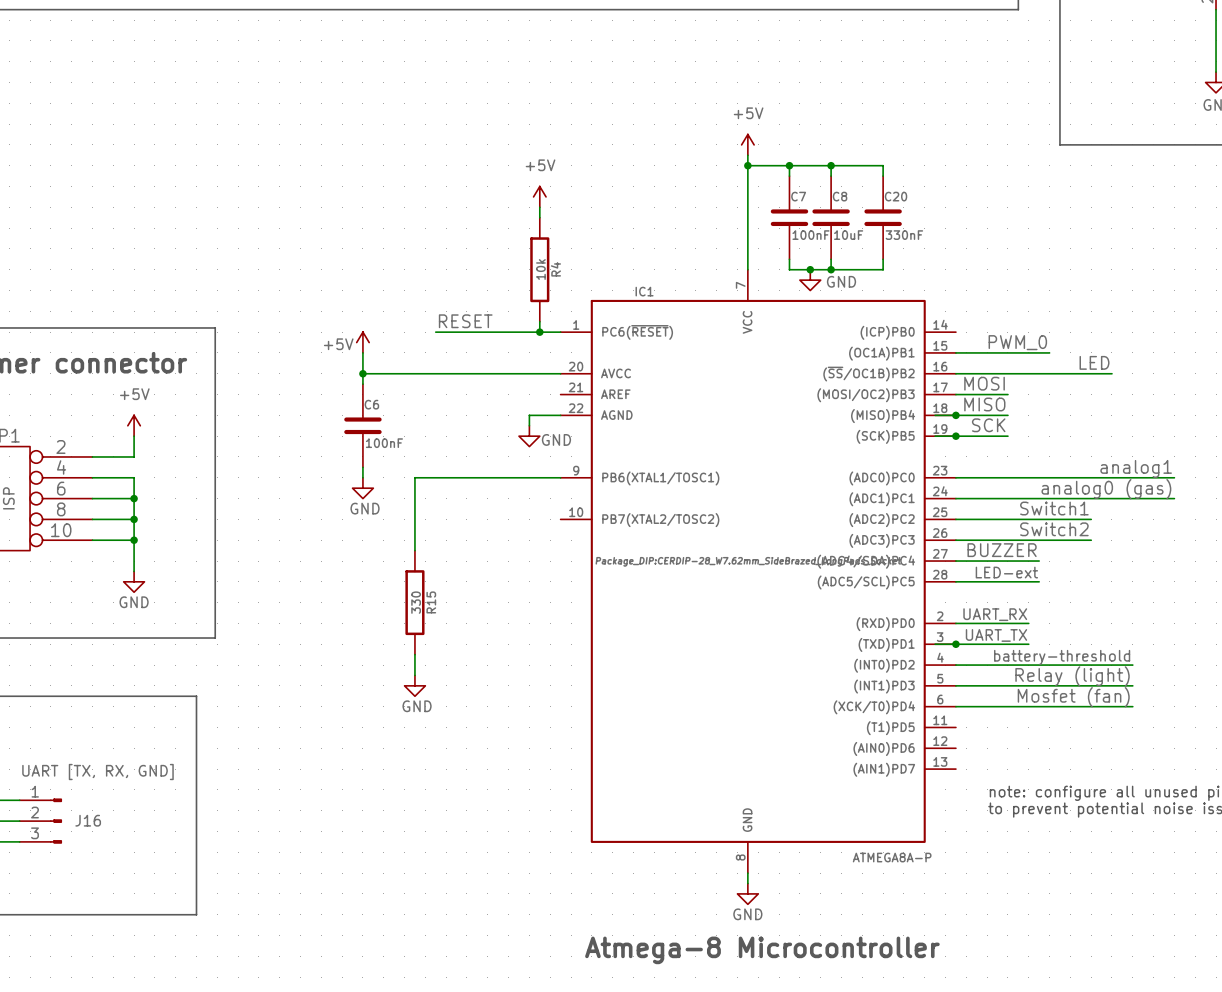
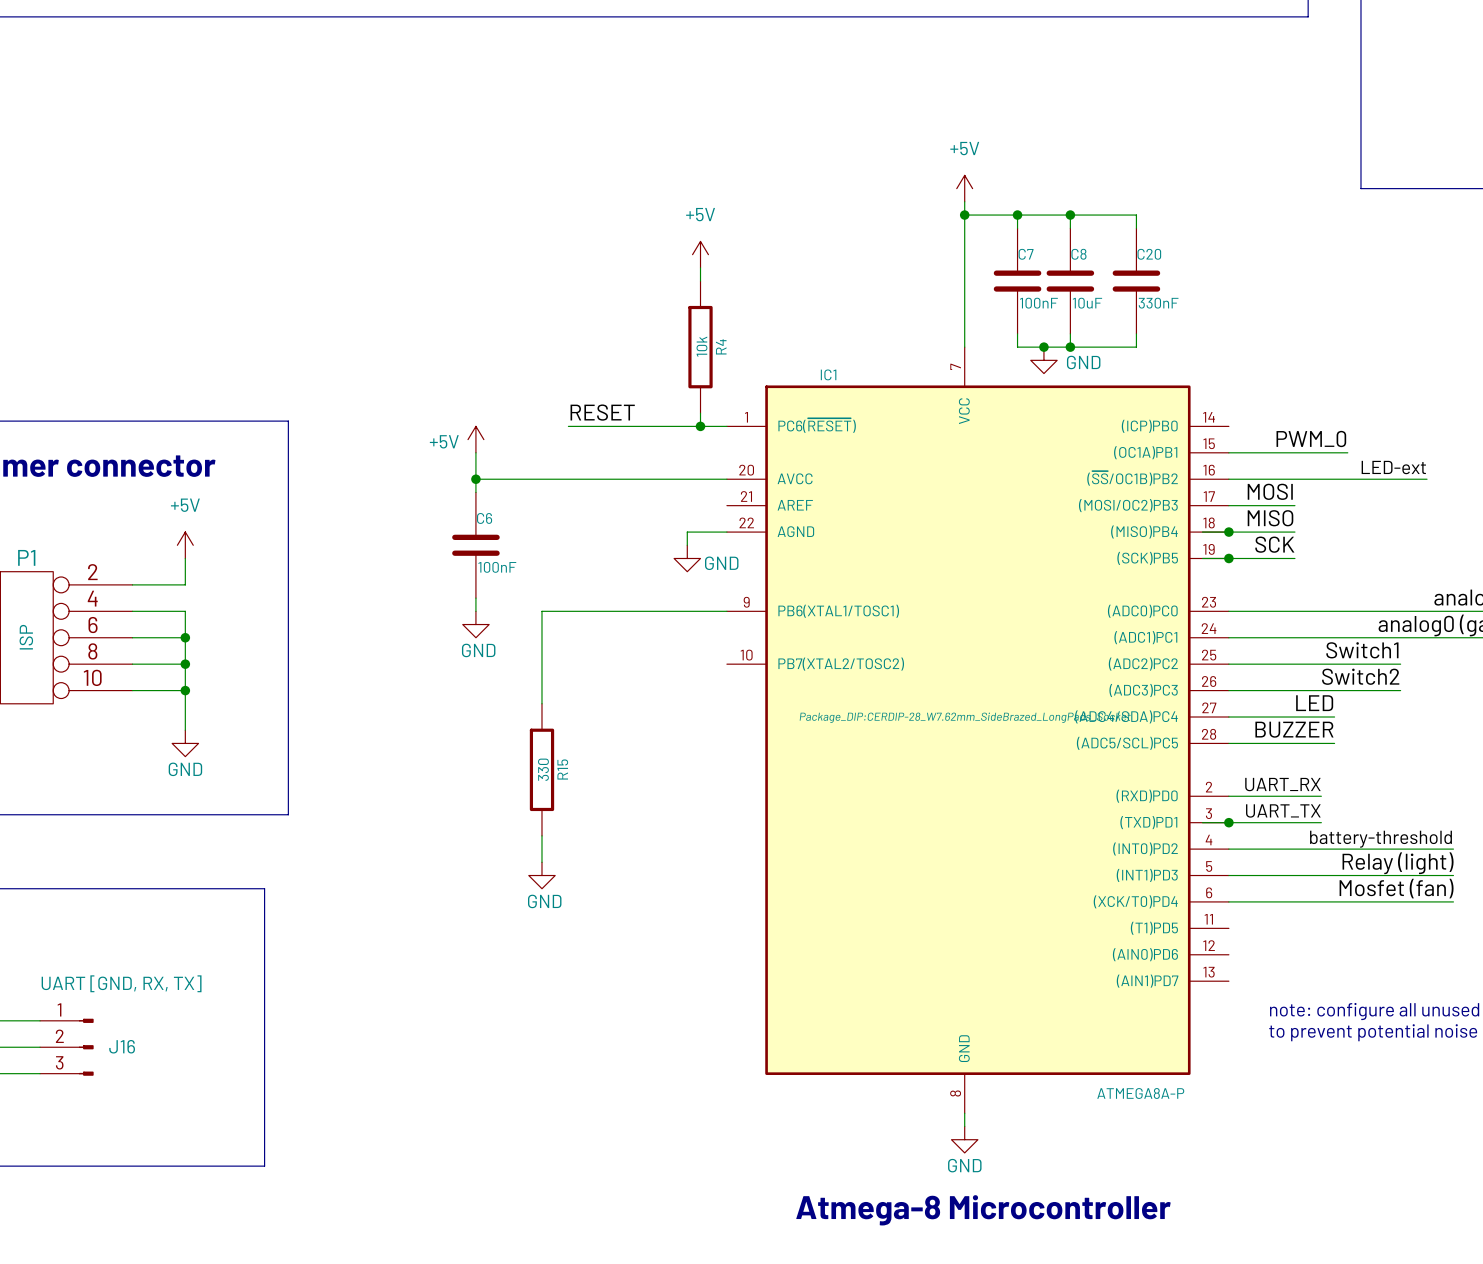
label: LED (1094, 362) -> LED-ext (1393, 467)
label: BUZZER (1002, 550) -> LED (1314, 703)
label: LED-ext (1006, 572) -> BUZZER (1294, 729)
J16 value: UART [TX, RX, GND] (97, 772) -> UART [GND, RX, TX] (121, 983)

